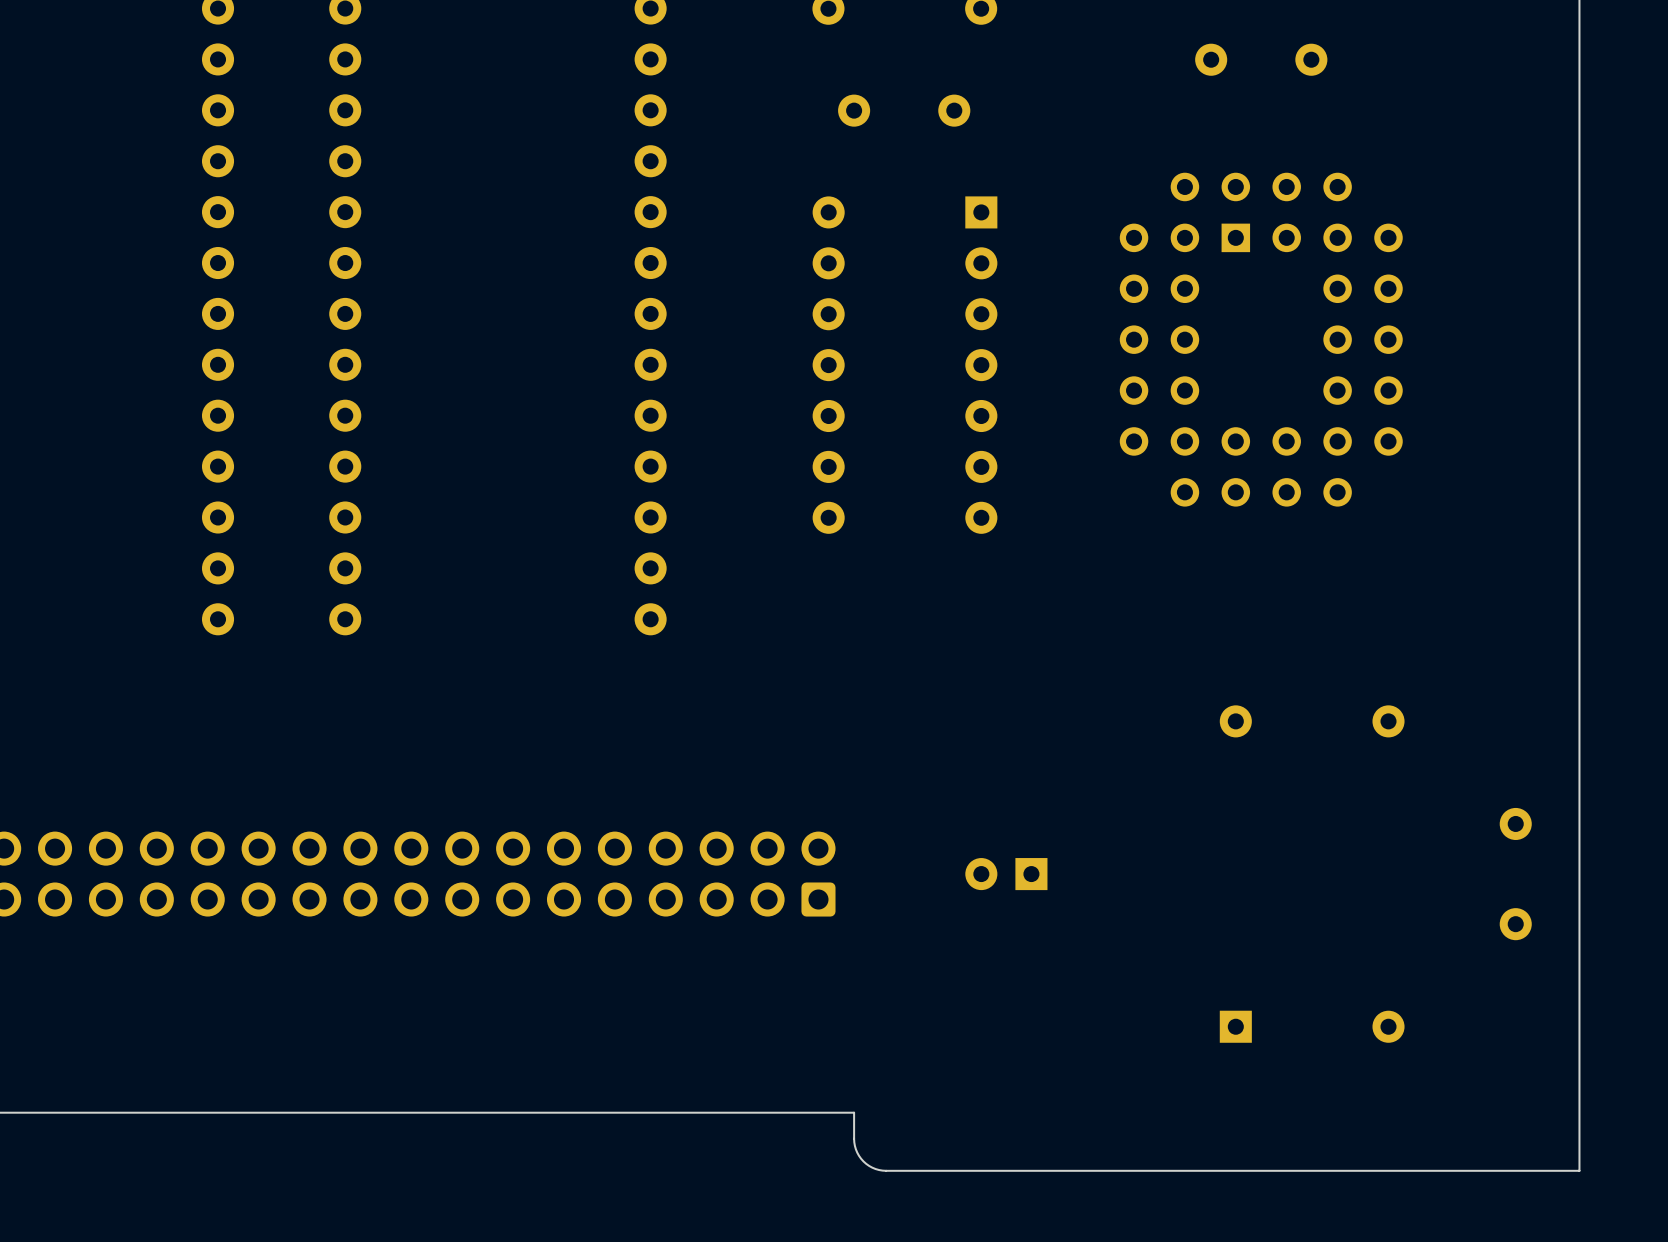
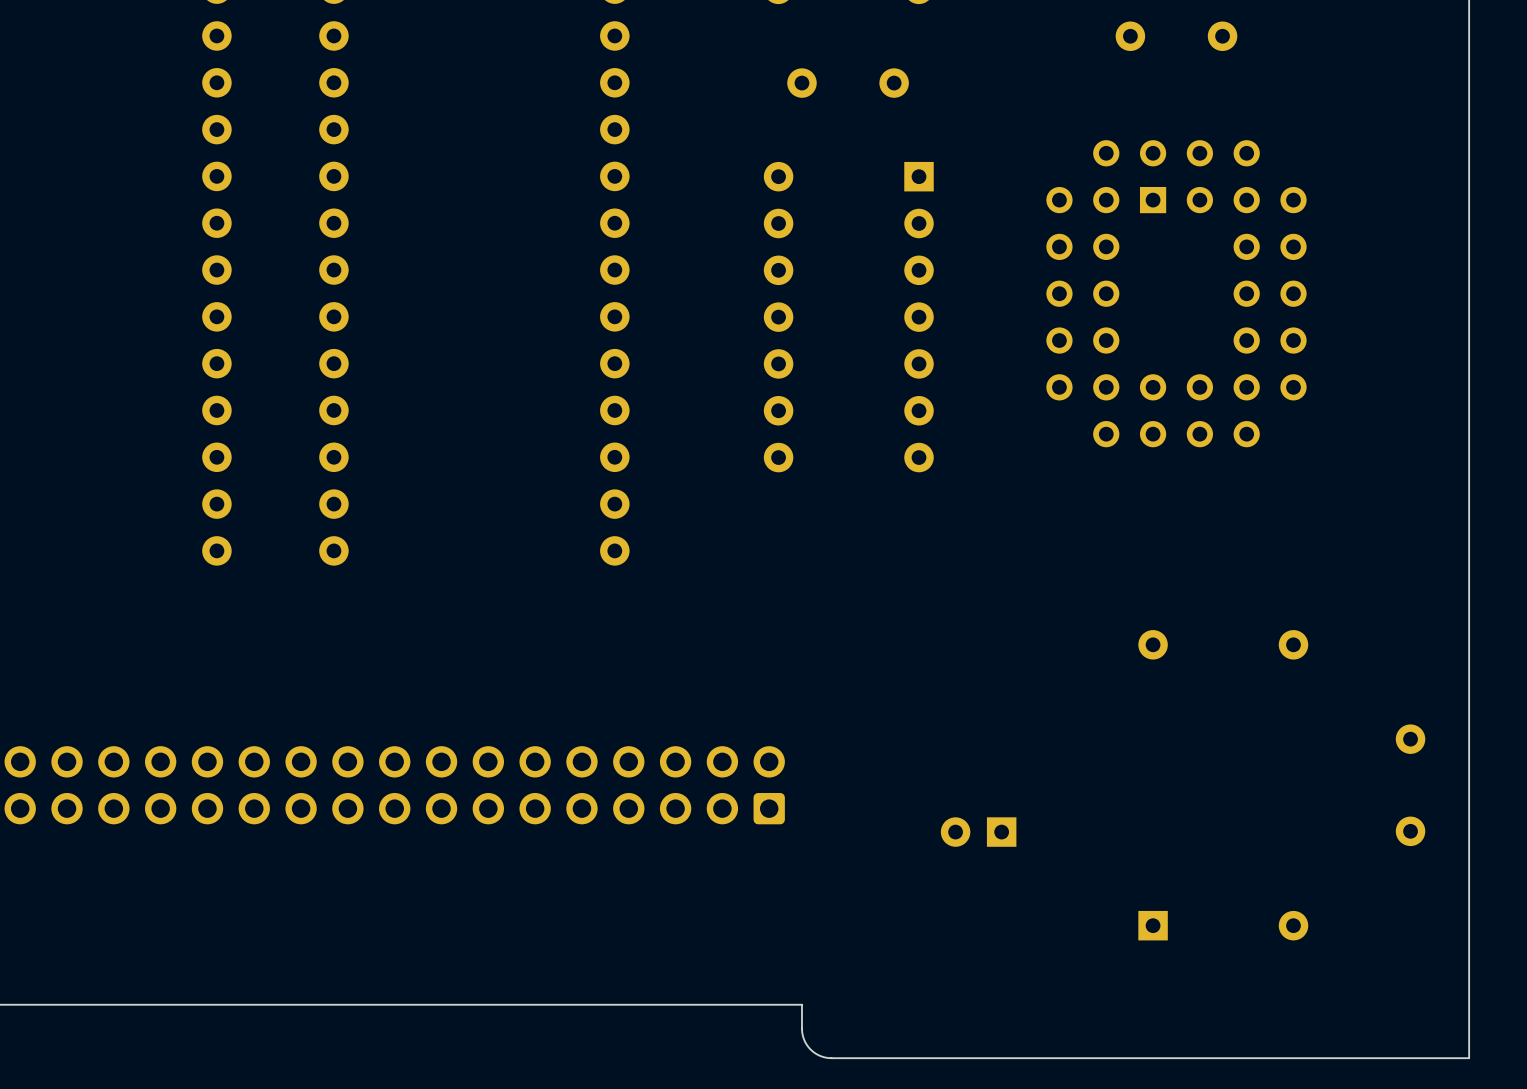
part position: (1006, 874) -> (978, 832)

